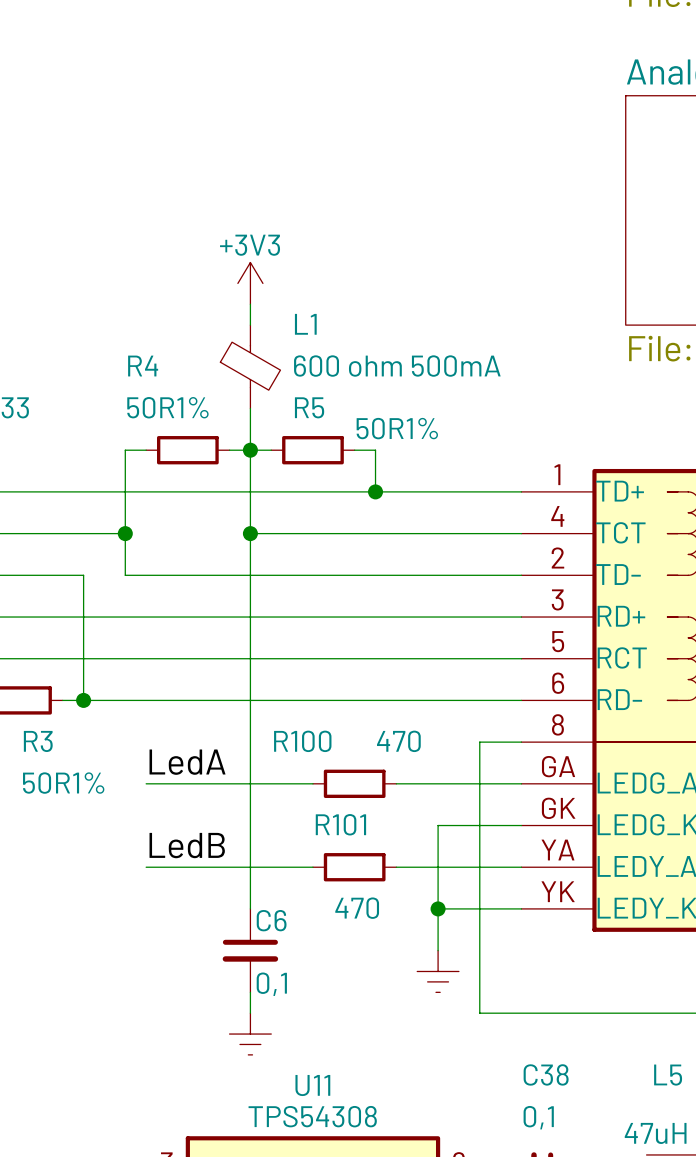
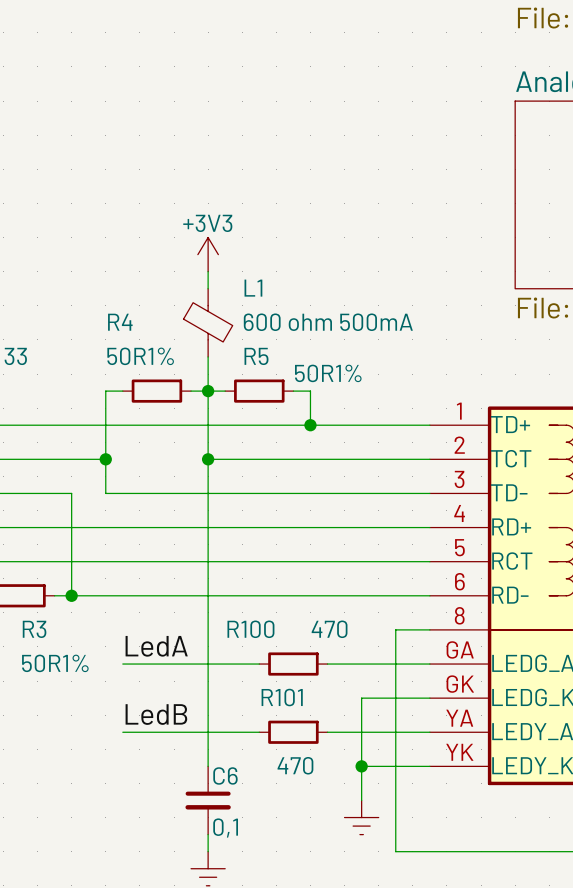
part pin number: 4 (557, 516) -> 2 (459, 445)
part pin number: 2 (557, 557) -> 3 (459, 479)
part pin number: 3 (557, 599) -> 4 (459, 513)

